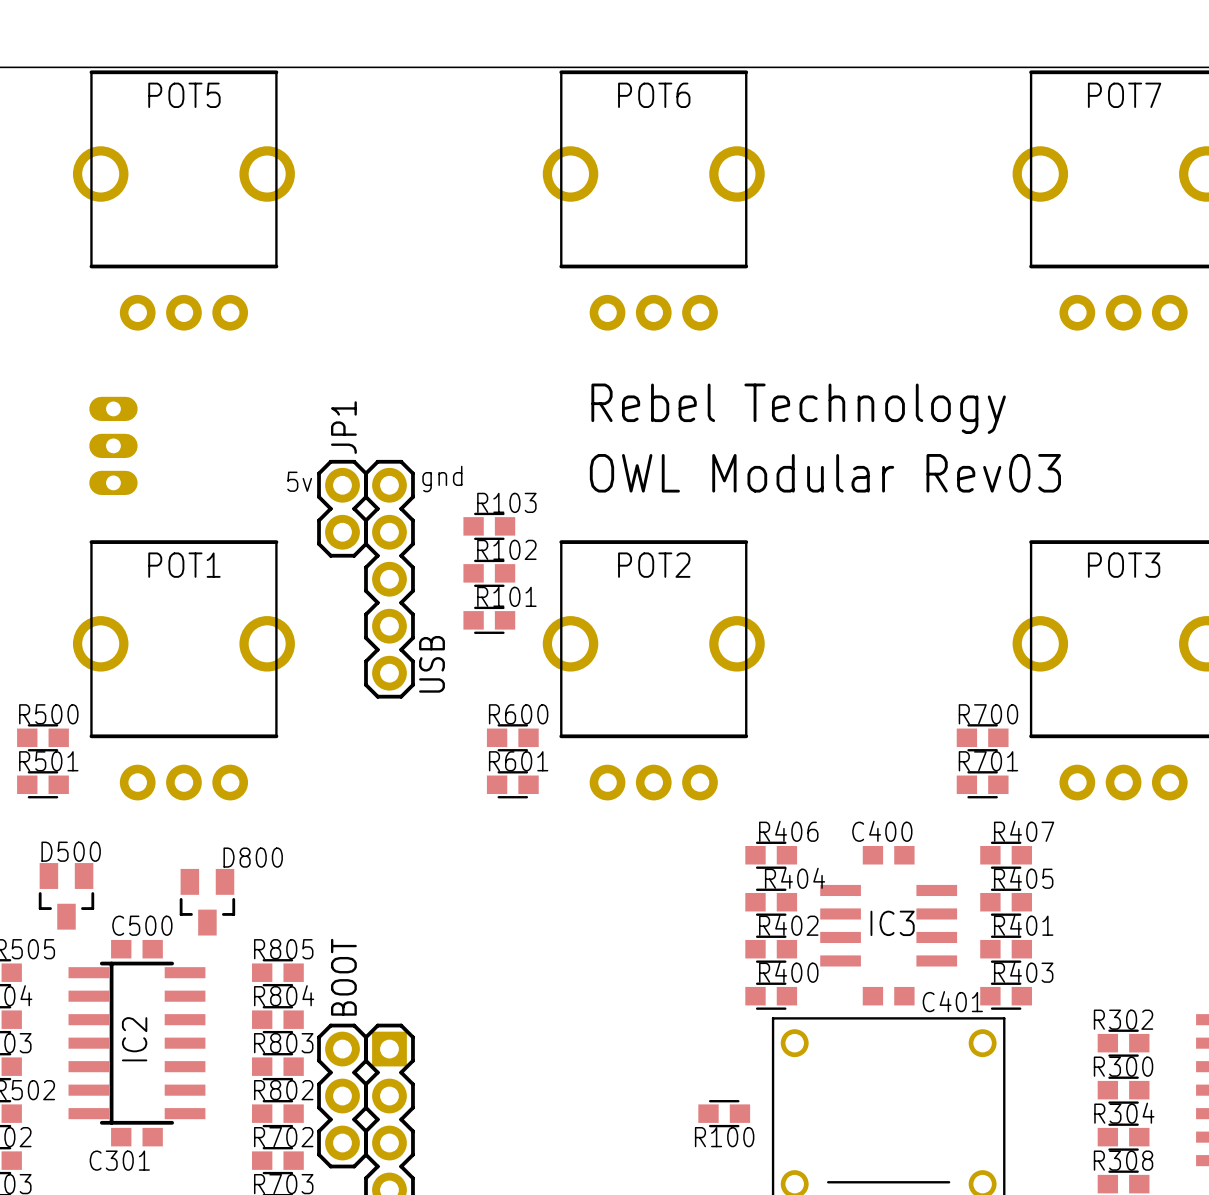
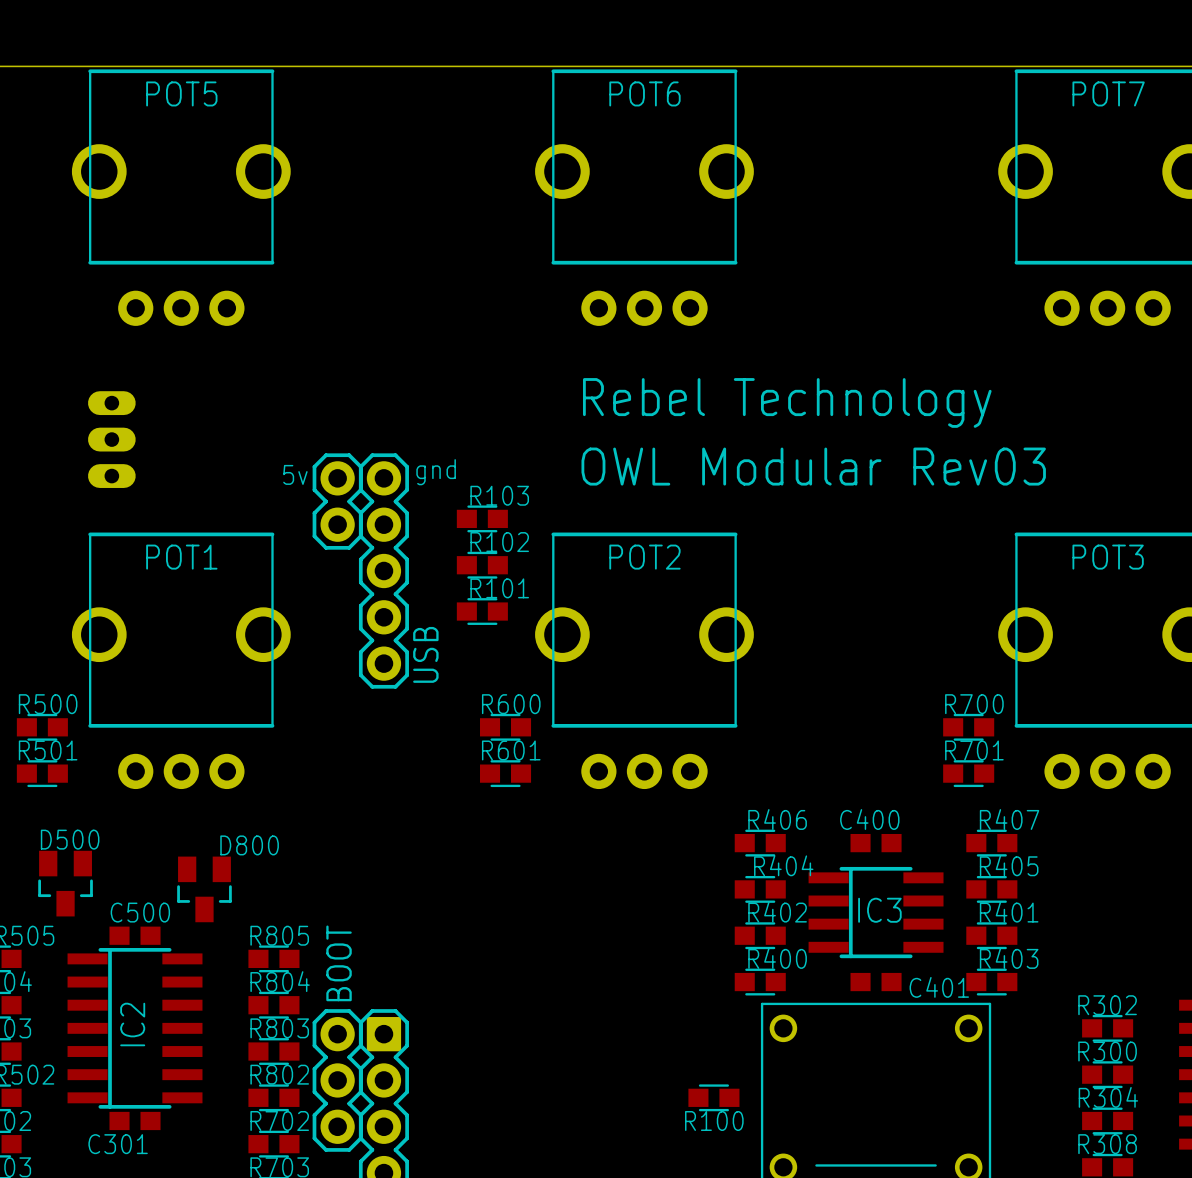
JP1 name: JP1 (343, 427) -> none
IC3 footprint: [820, 884, 958, 967] -> [808, 866, 944, 959]

